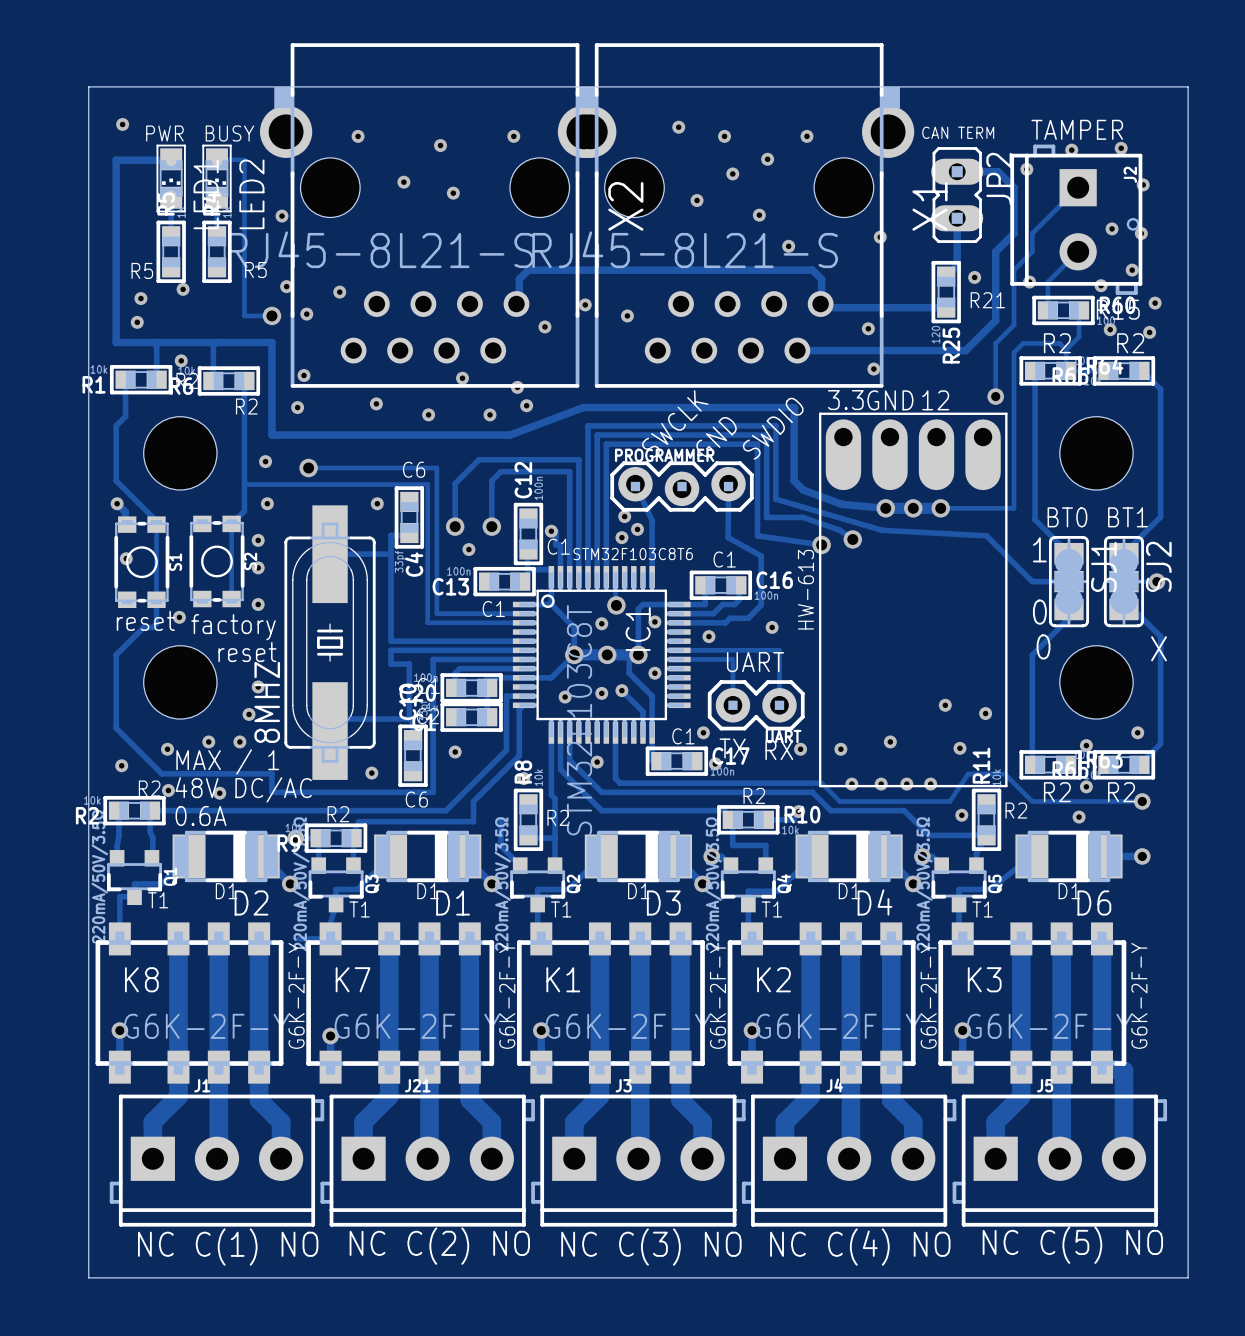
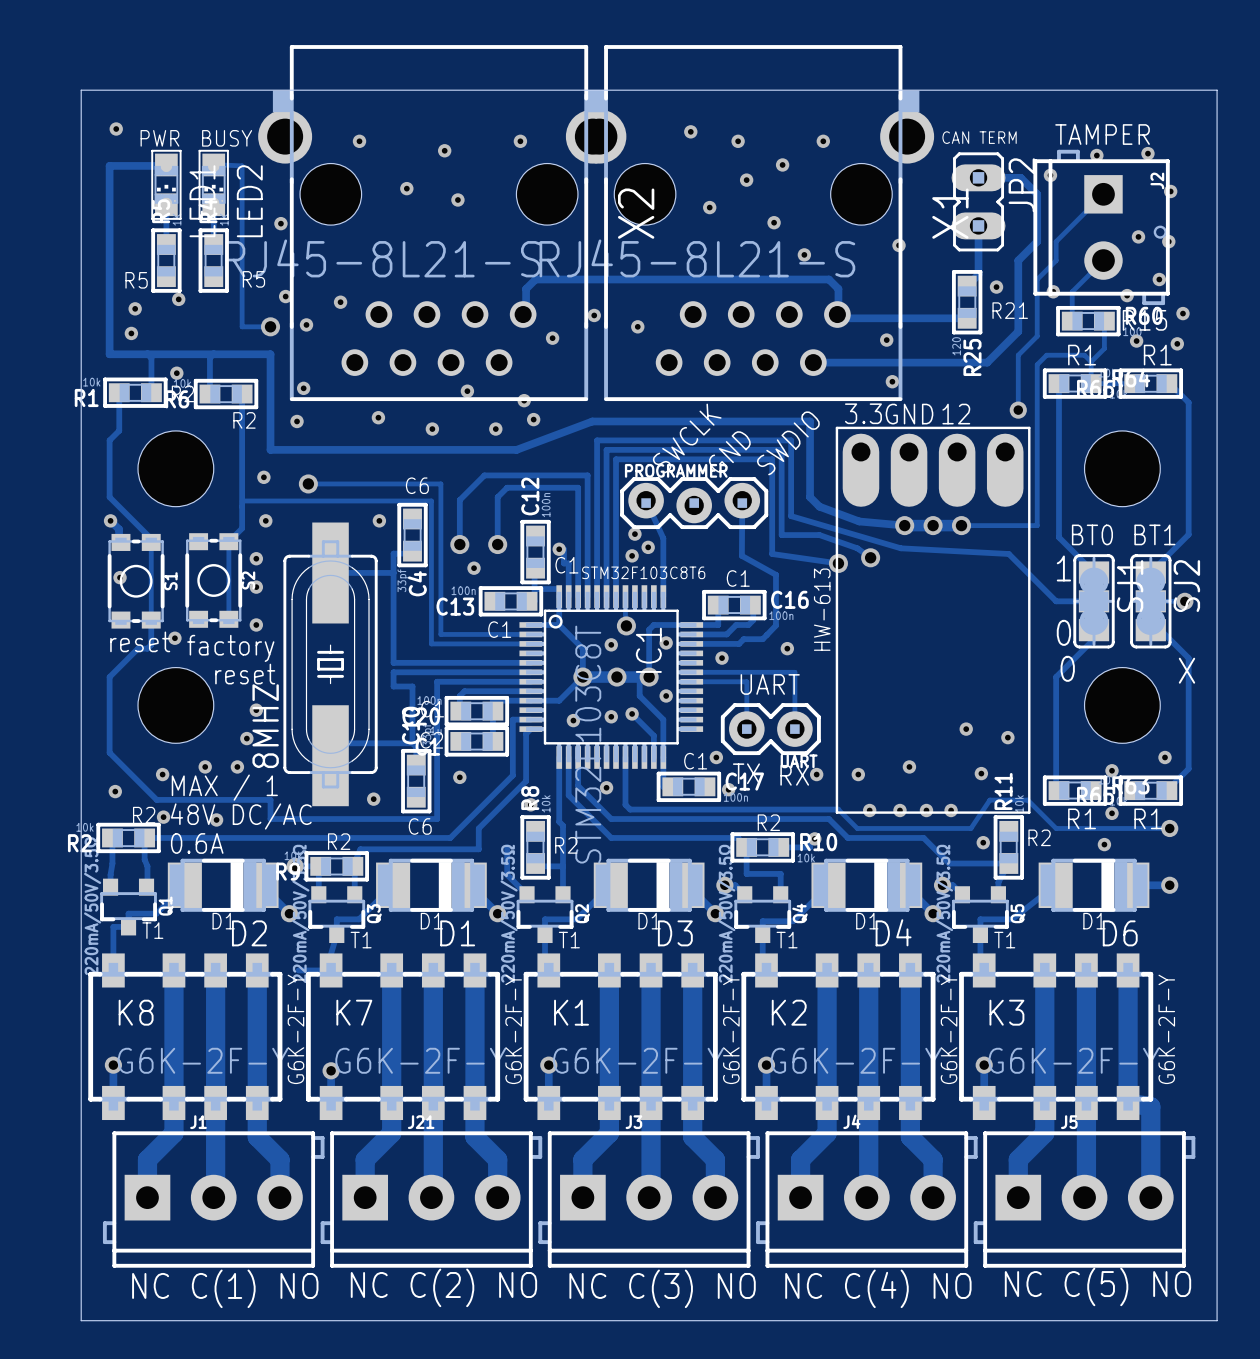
text: R2 (1057, 343) -> R1 (1082, 355)
text: R2 (1130, 343) -> R1 (1157, 355)
text: R2 (1057, 792) -> R1 (1082, 818)
text: R2 (1121, 792) -> R1 (1148, 818)

